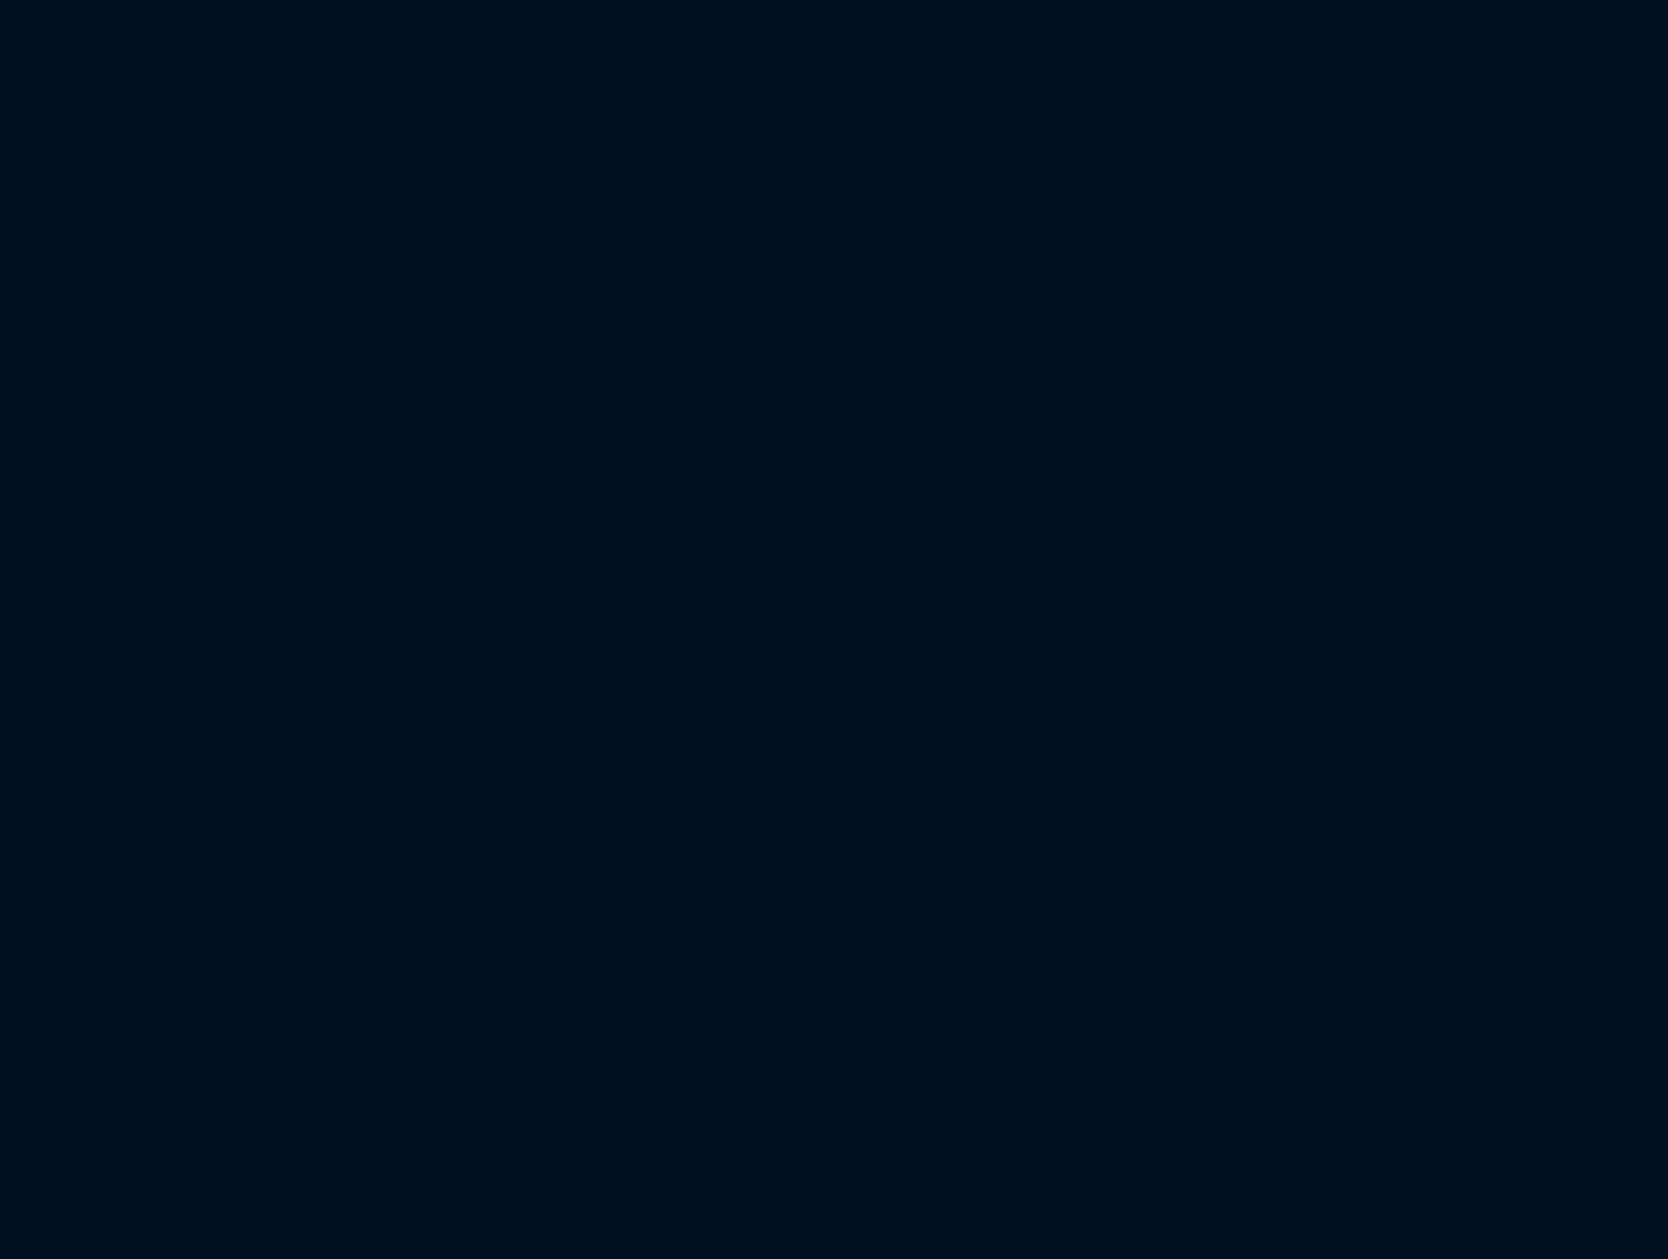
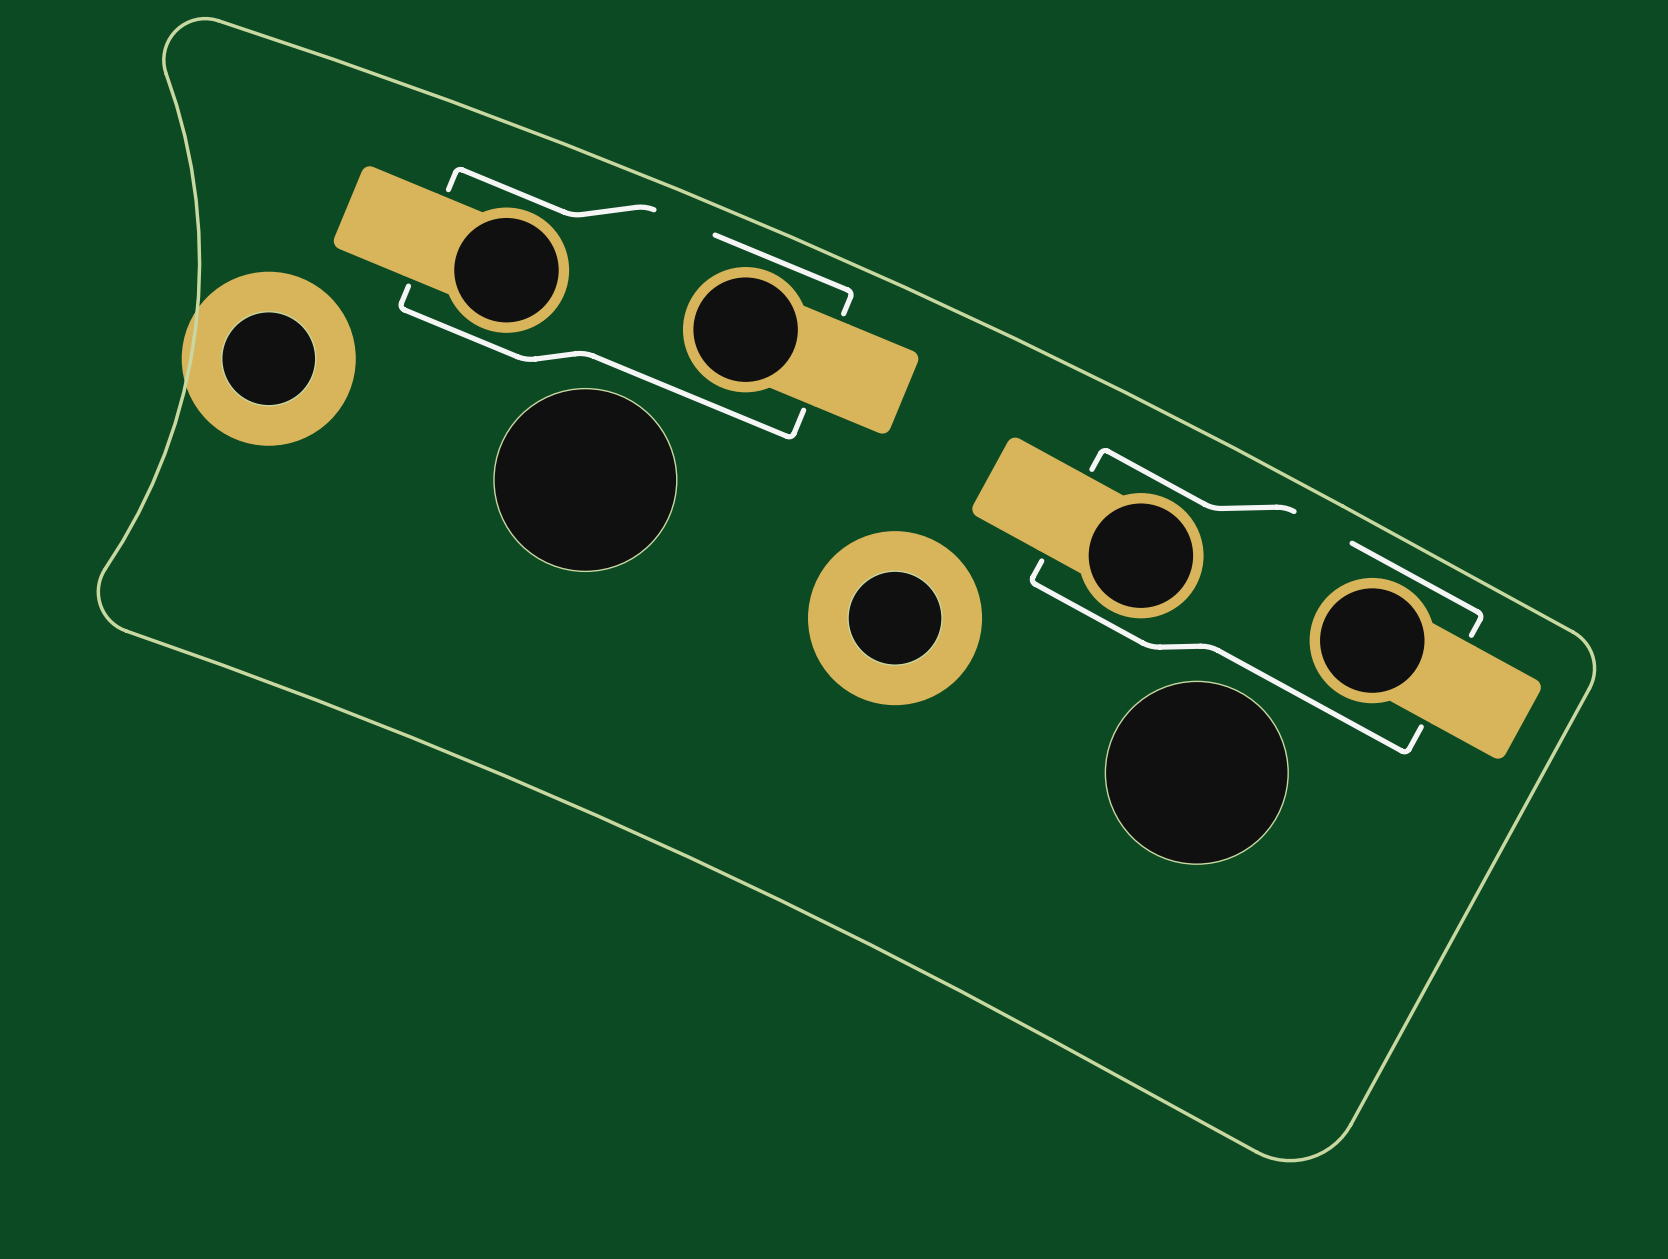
board edge: none -> (218, 20) (334, 59) (564, 144) (791, 237) (903, 286) (1125, 392) (1234, 448) (1573, 632) (1583, 640) (1589, 648) (1593, 661) (1594, 675) (1589, 688) (1350, 1124) (1336, 1142) (1316, 1155) (1302, 1159) (1278, 1159) (1263, 1155) (961, 991) (780, 900) (689, 857) (597, 815) (410, 737) (221, 664) (126, 631) (110, 620) (100, 604) (98, 595) (99, 581) (138, 513) (164, 454) (183, 392) (195, 328) (199, 264) (196, 199) (184, 136) (164, 69) (164, 54) (172, 35) (183, 24) (197, 19) (218, 20)
part: none -> (268, 358)
part: none -> (626, 368)
part: none -> (895, 618)
part: none -> (1256, 650)

